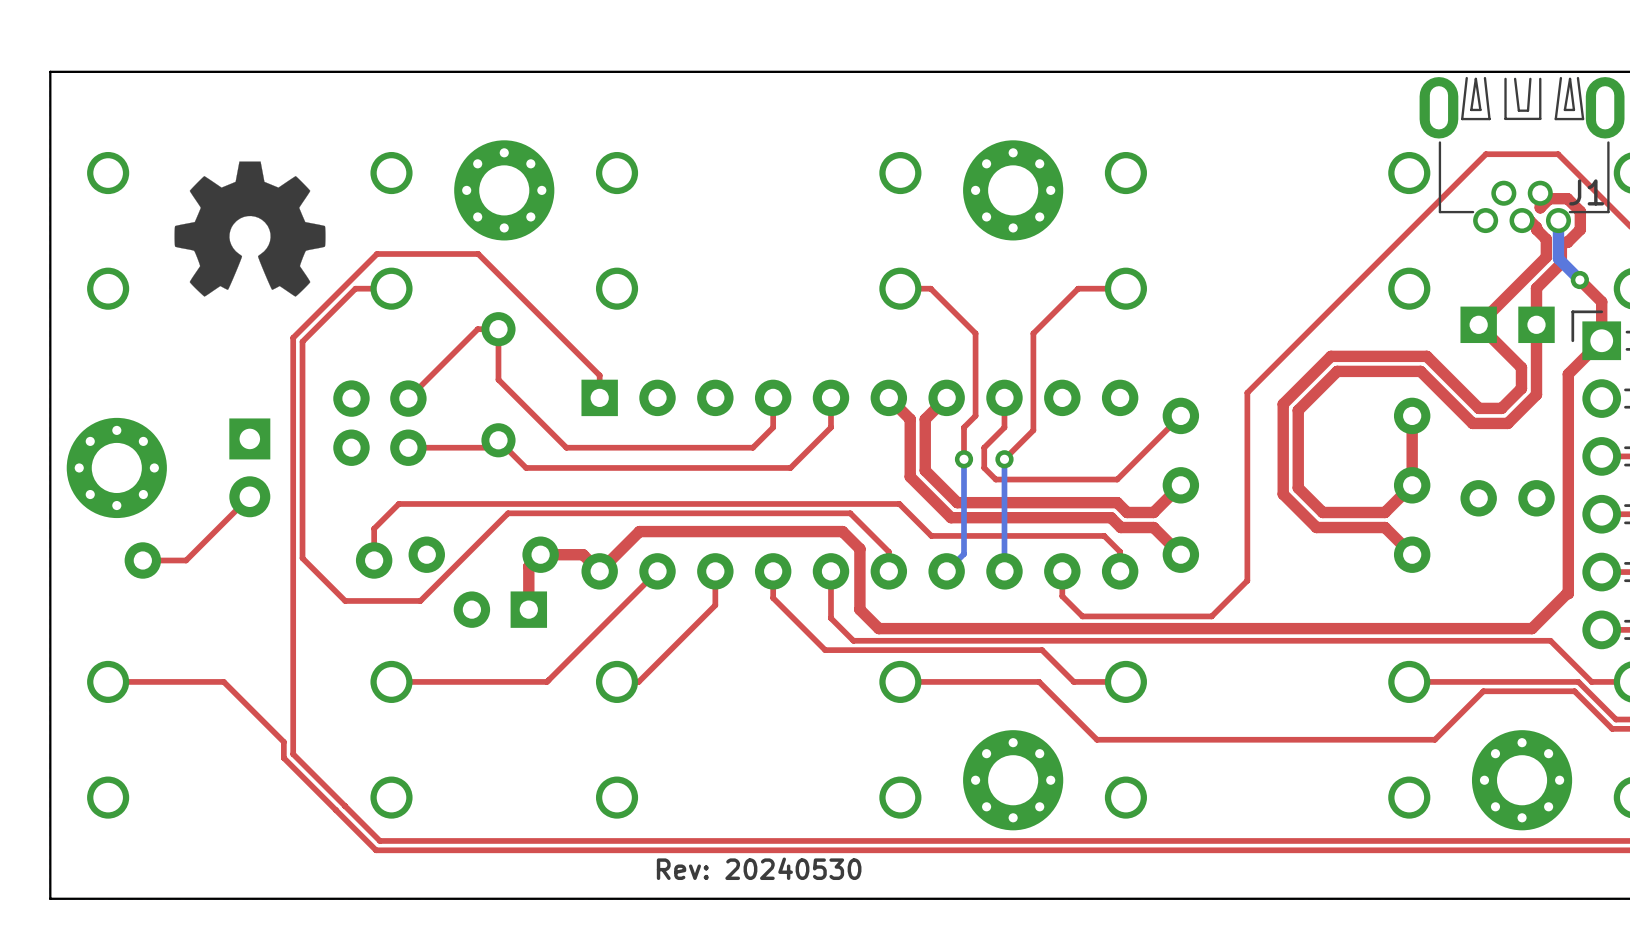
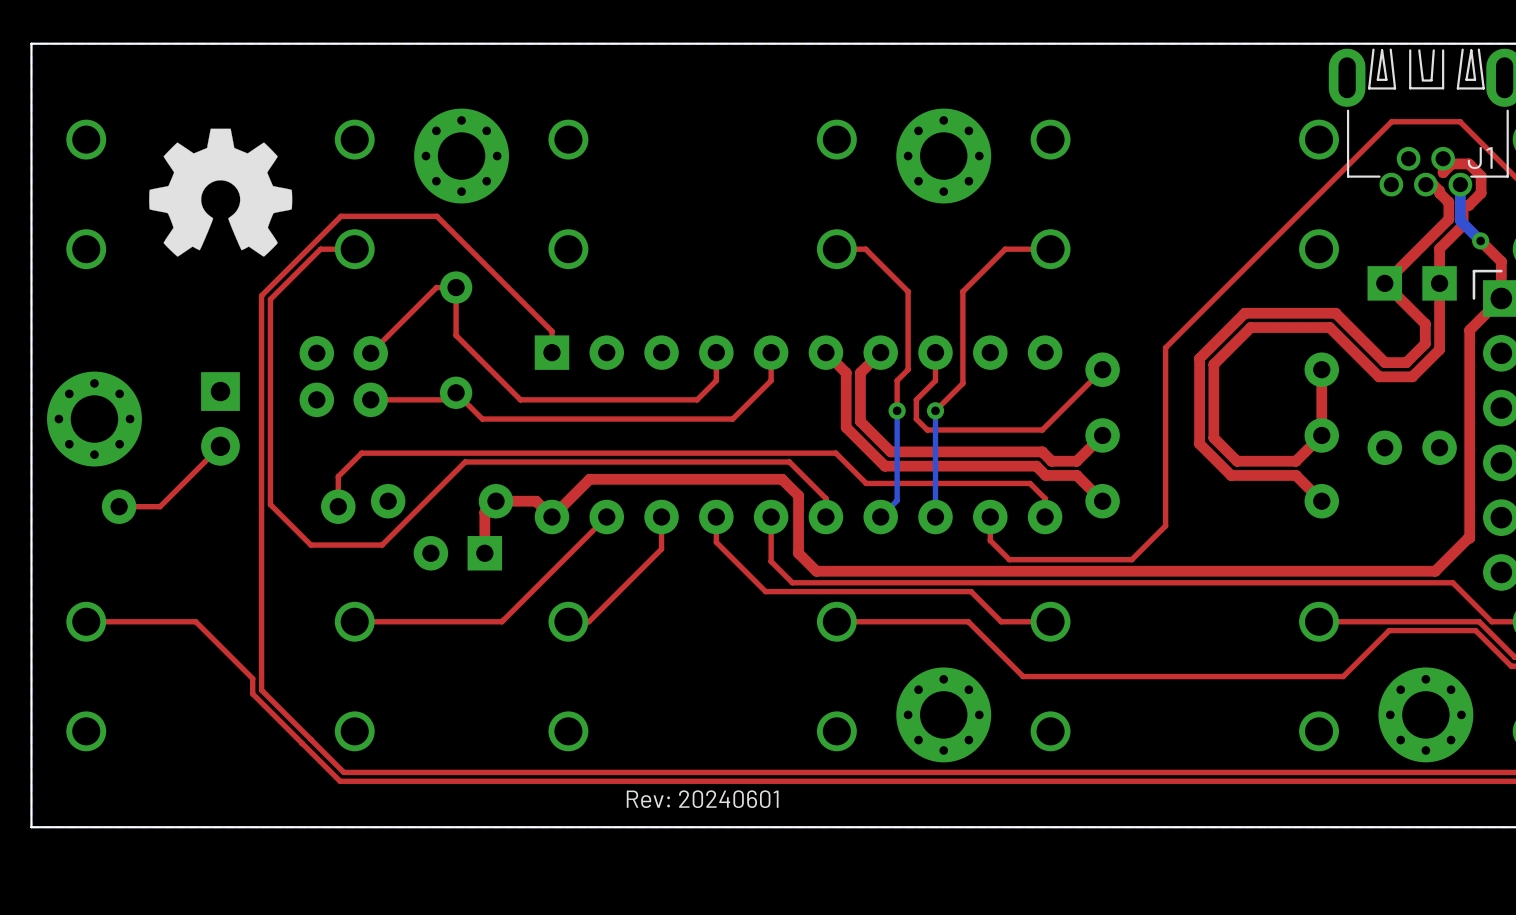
text: Rev: 20240530 (759, 868) -> Rev: 20240601 (702, 799)

